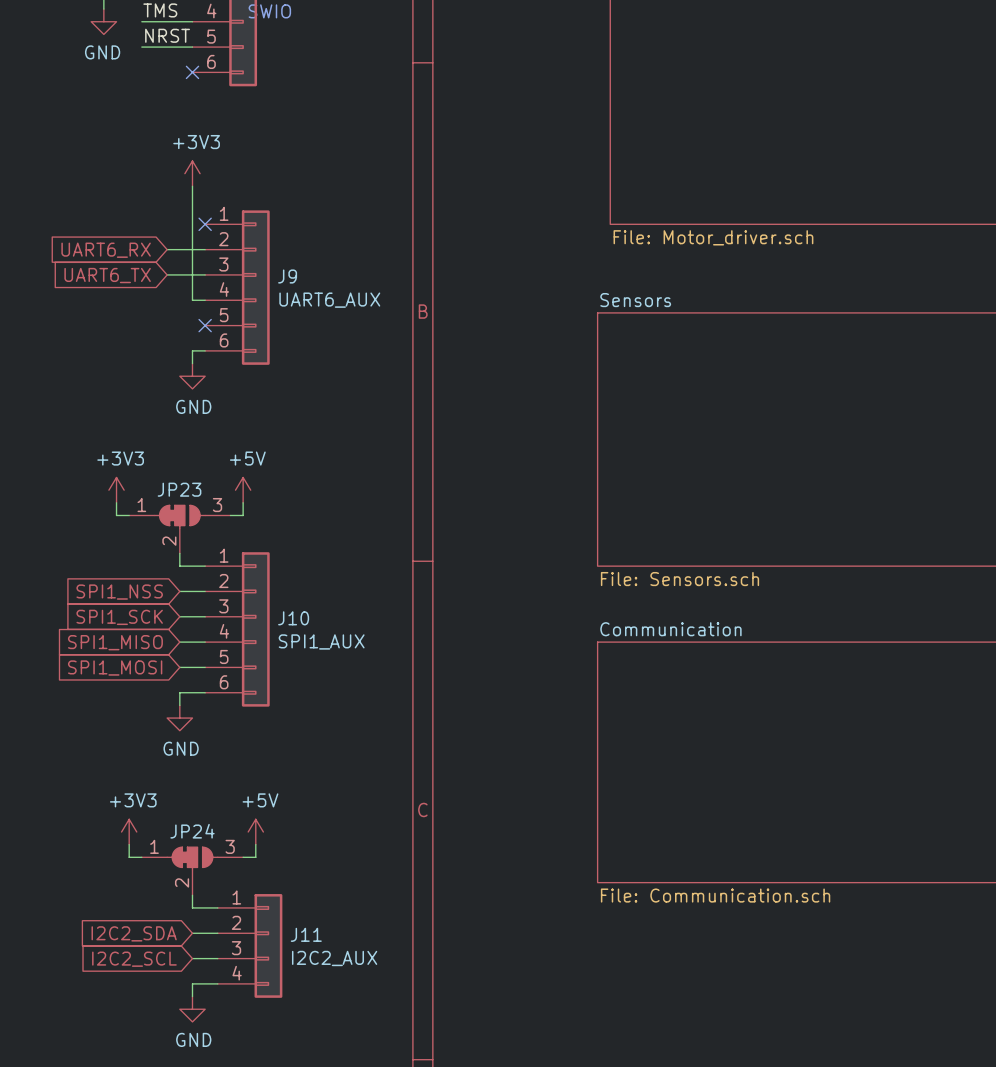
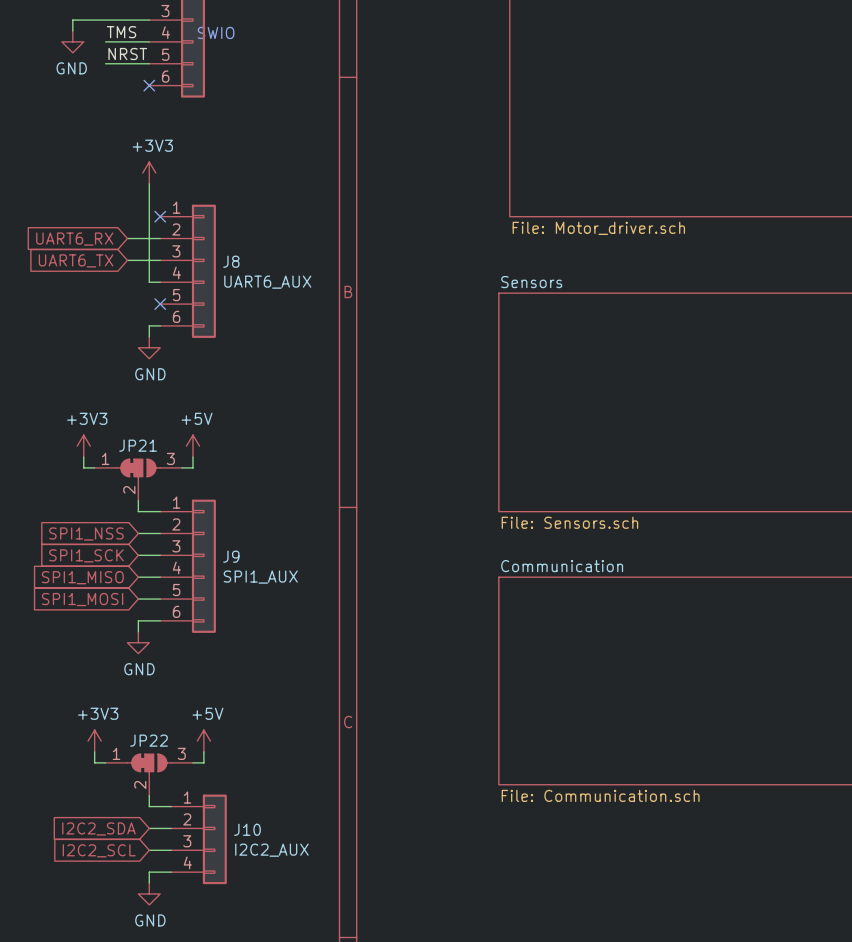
J9 name: J9 (287, 276) -> J8 (231, 261)
JP23 name: JP23 (179, 489) -> JP21 (138, 445)
J10 name: J10 (293, 618) -> J9 (231, 556)
JP24 name: JP24 (192, 831) -> JP22 (149, 740)
J11 name: J11 (306, 934) -> J10 (247, 829)

